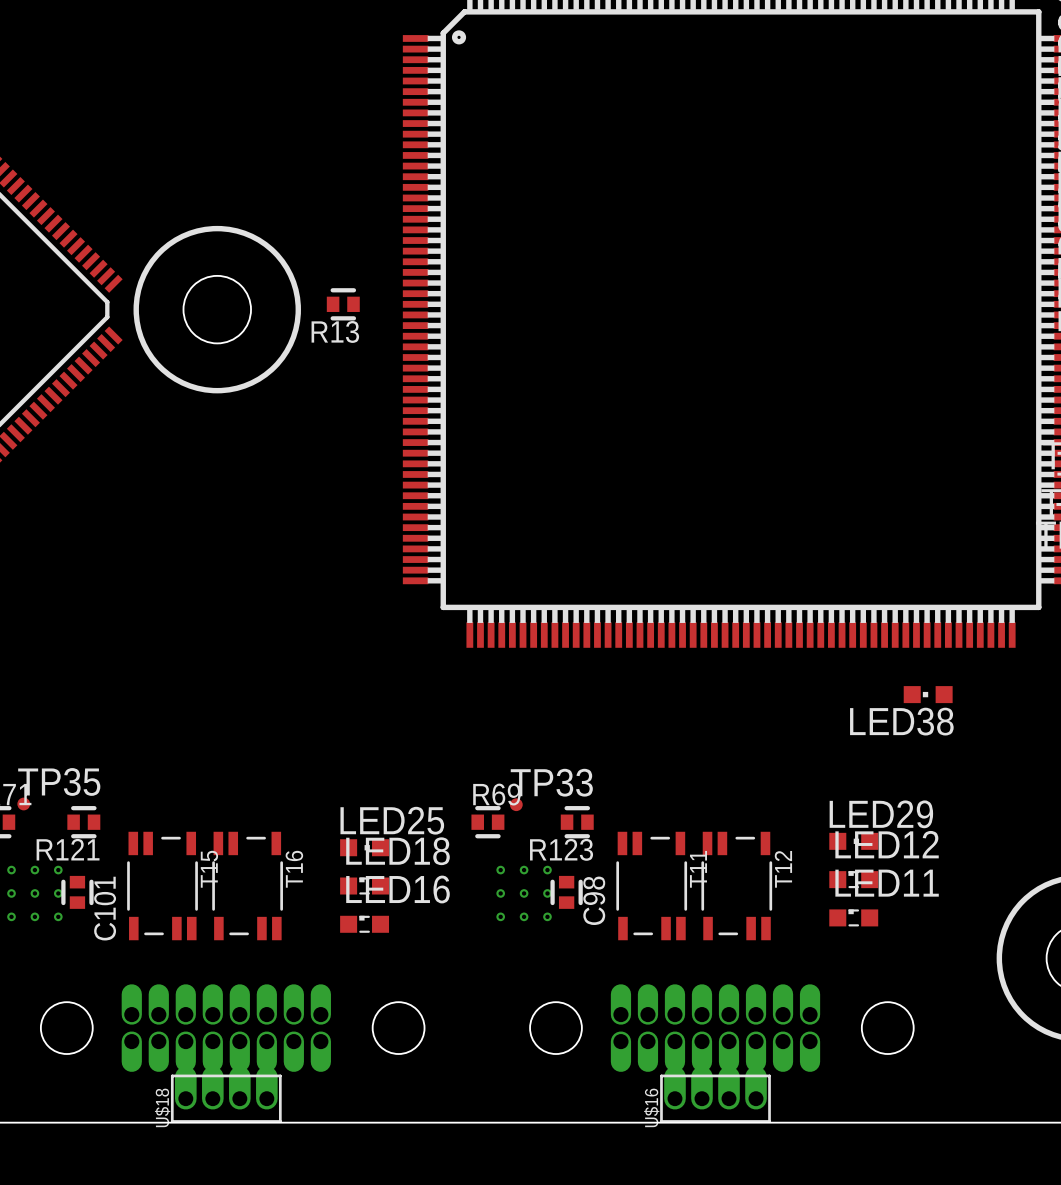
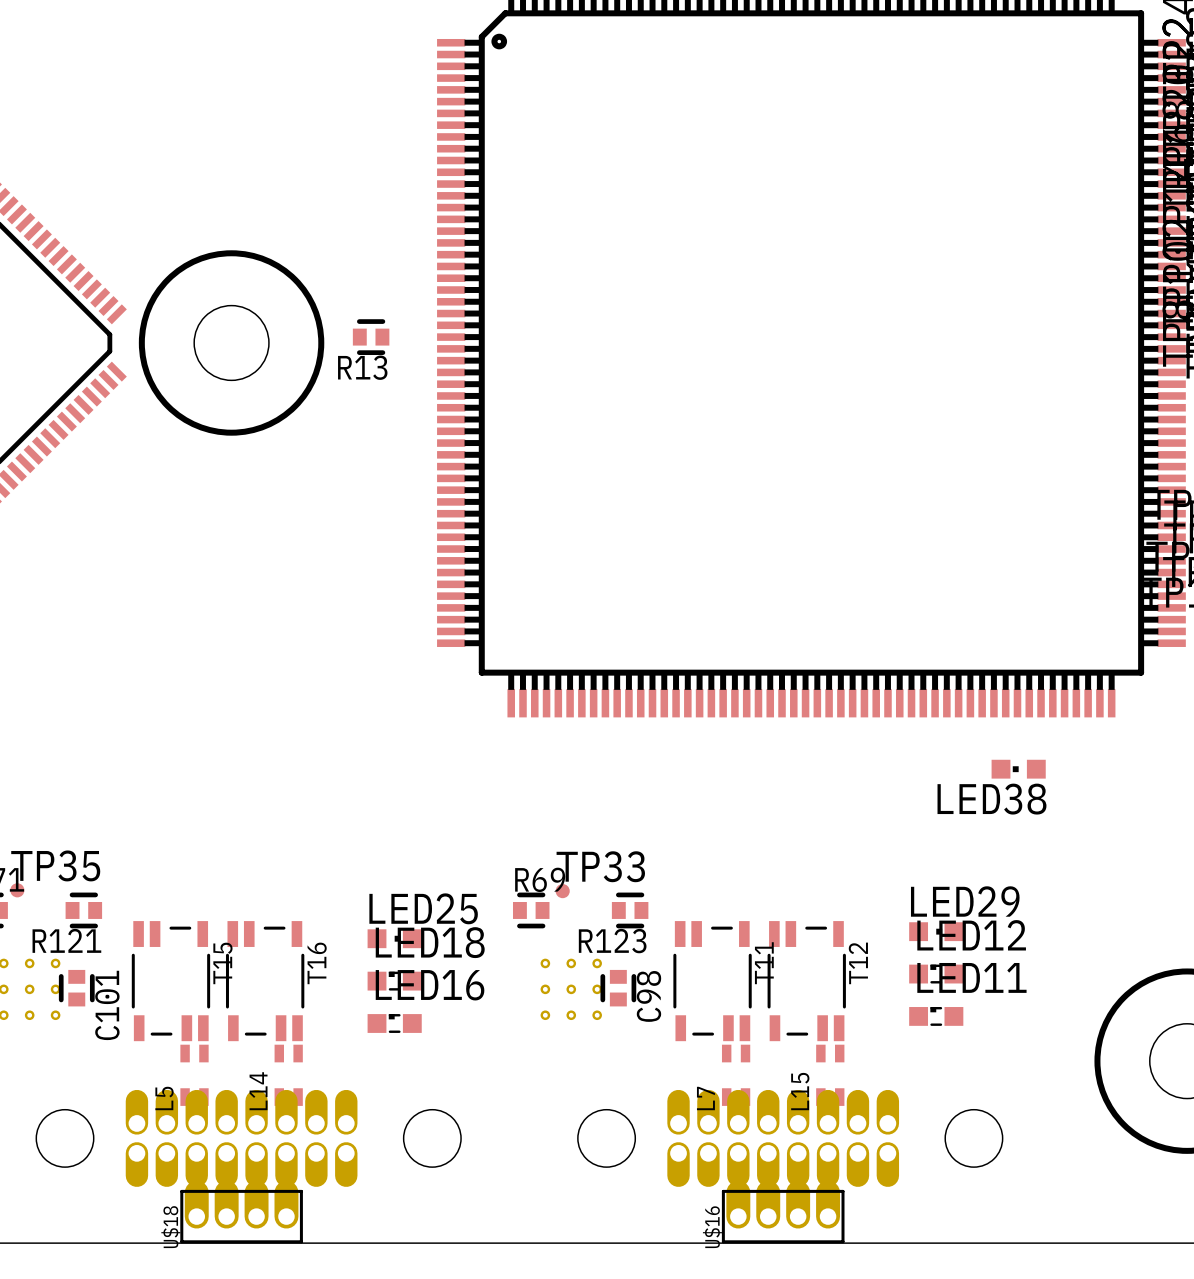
L5: none -> (194, 1075)
L14: none -> (288, 1075)
L7: none -> (736, 1075)
L15: none -> (830, 1075)

